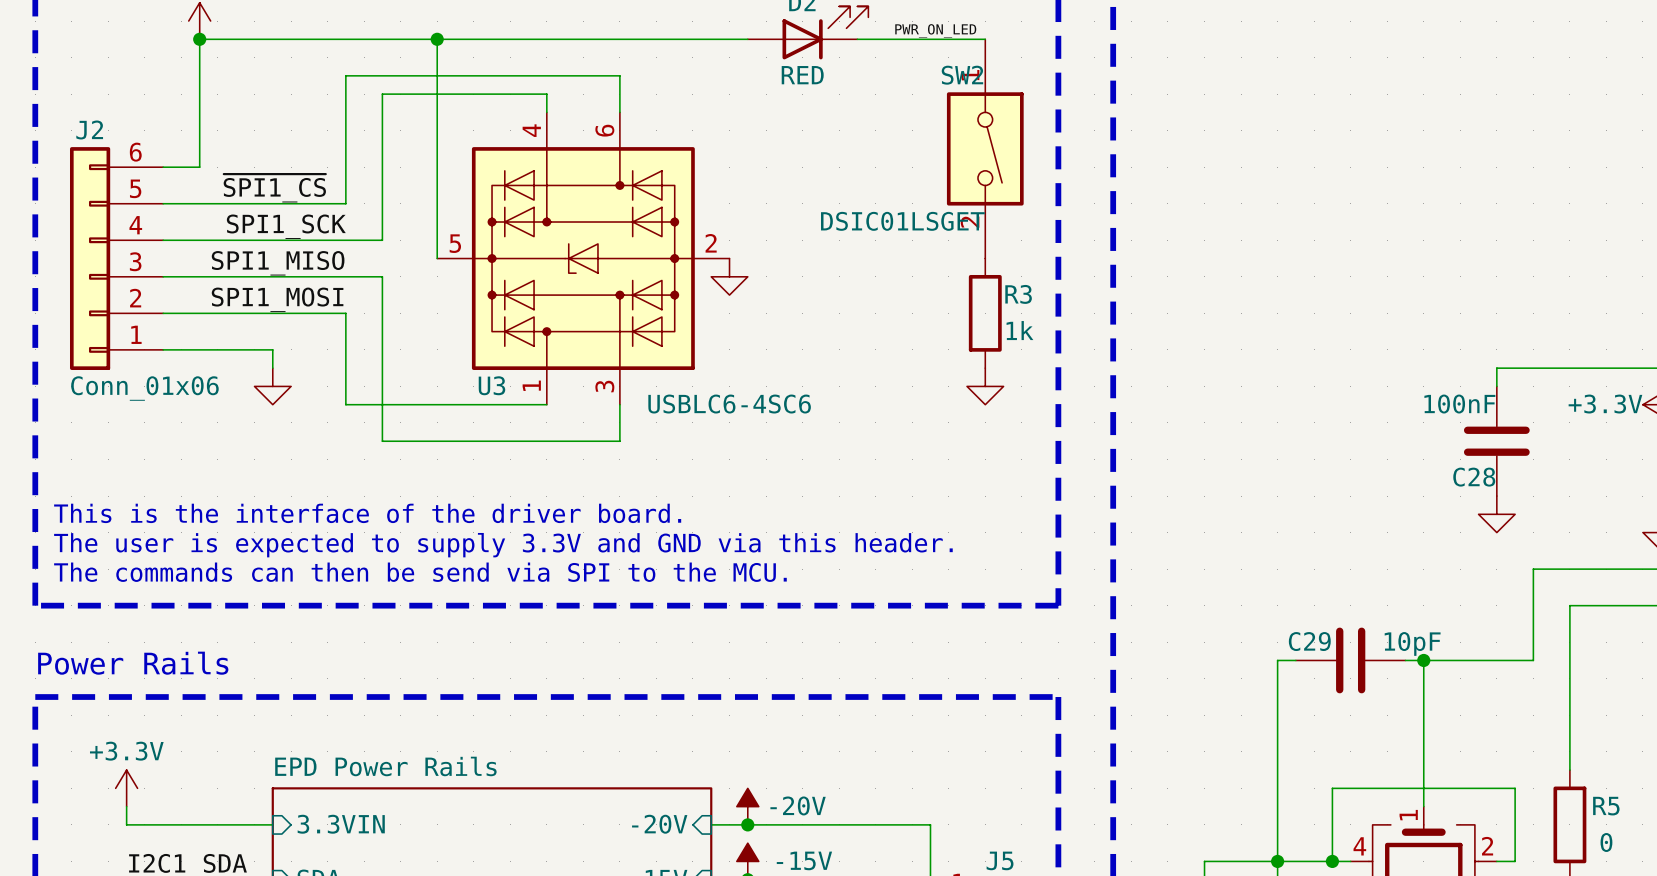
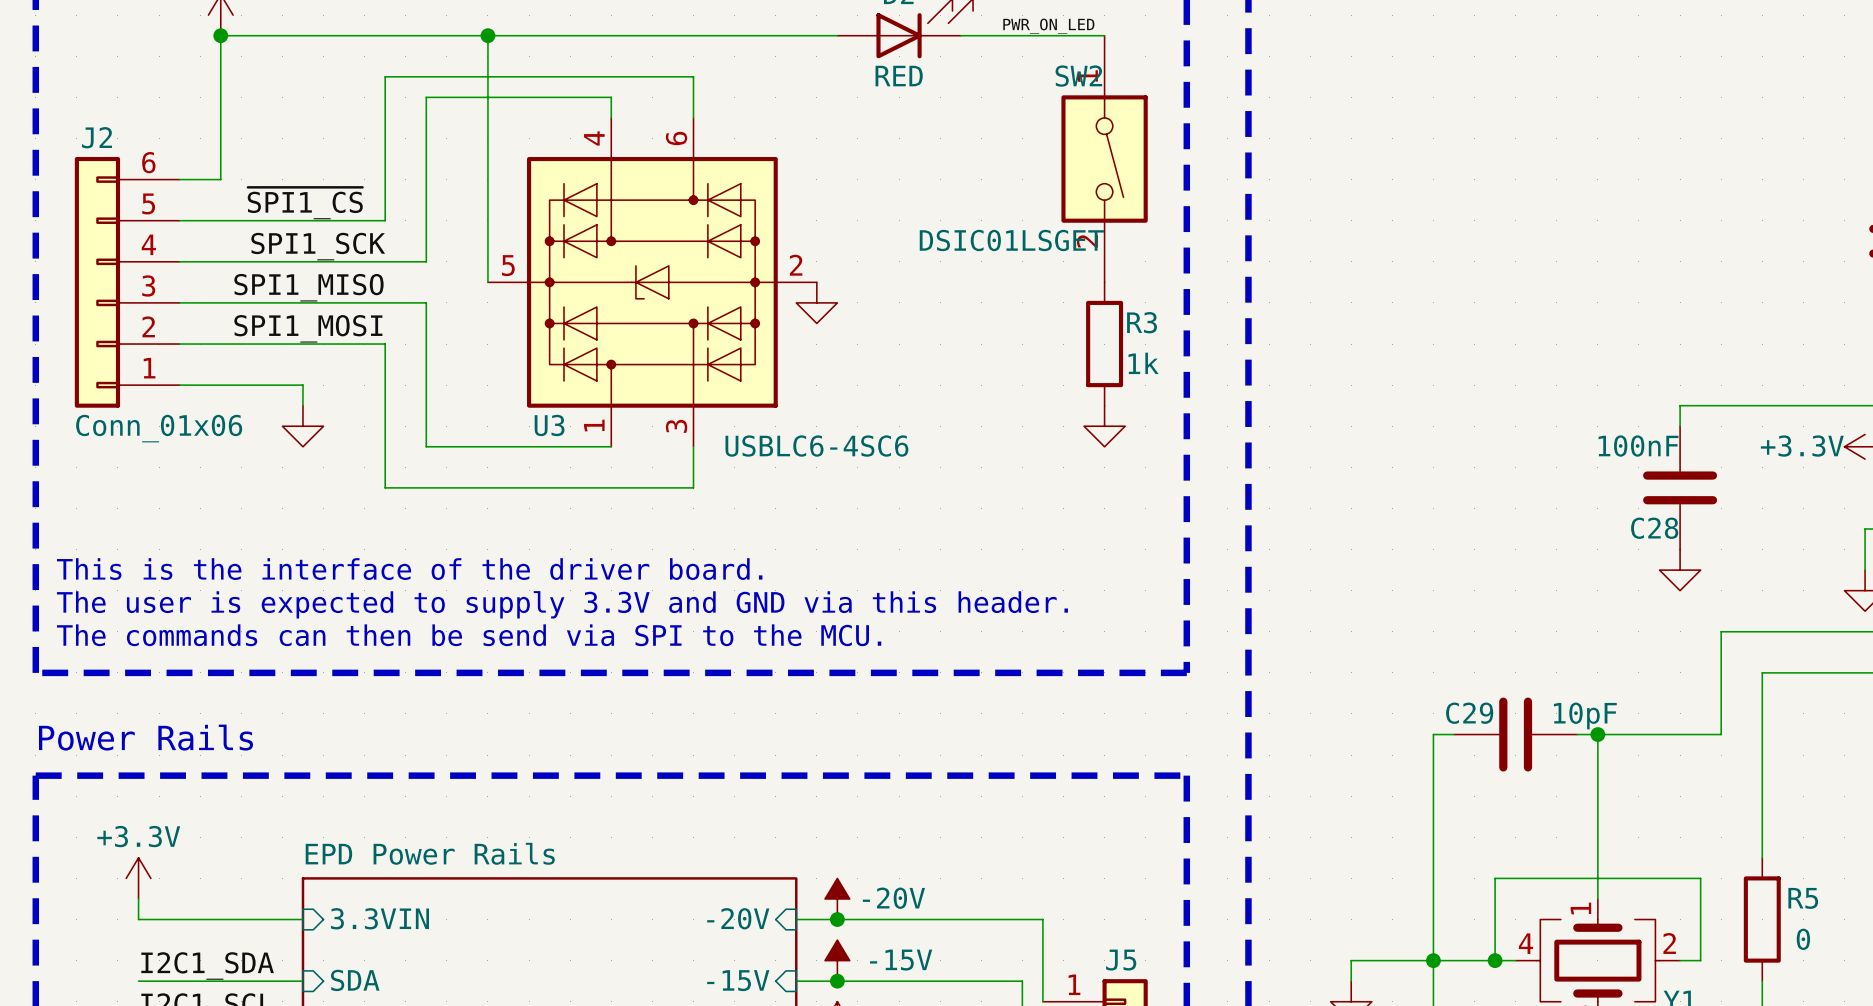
wire: (345, 404) (382, 404) (382, 441) -> (385, 446) (385, 487) (426, 487)

